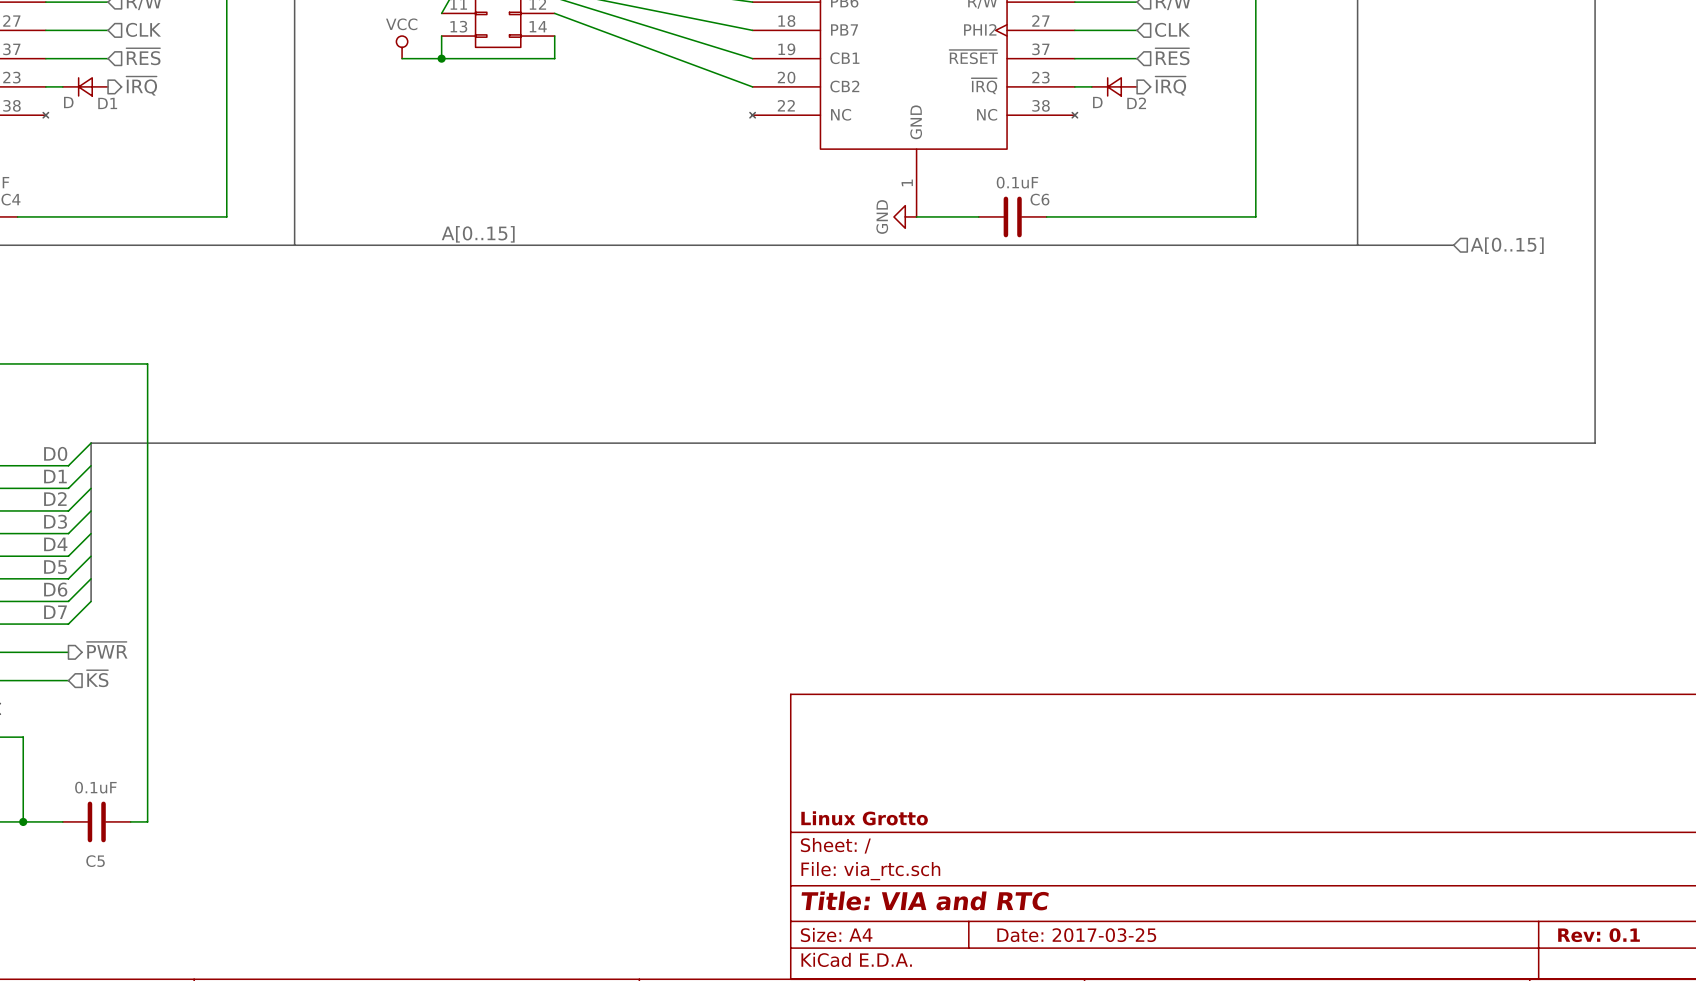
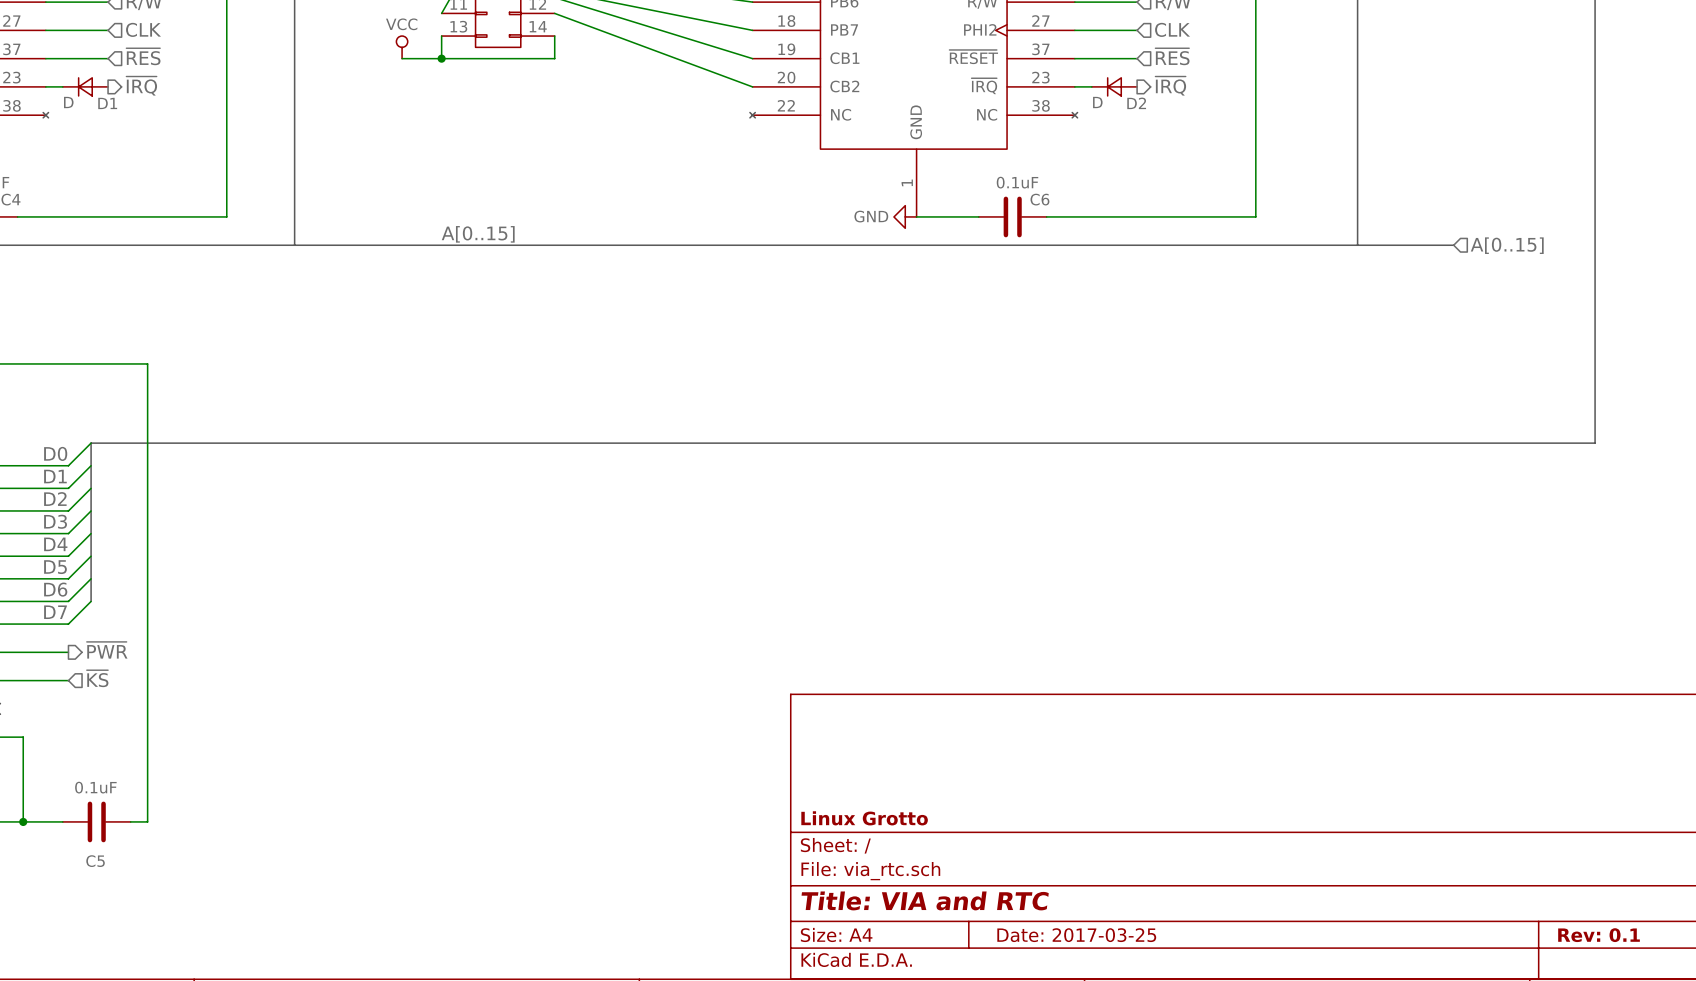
power symbol text rotation: 0° (882, 216) -> 90° clockwise (871, 216)

